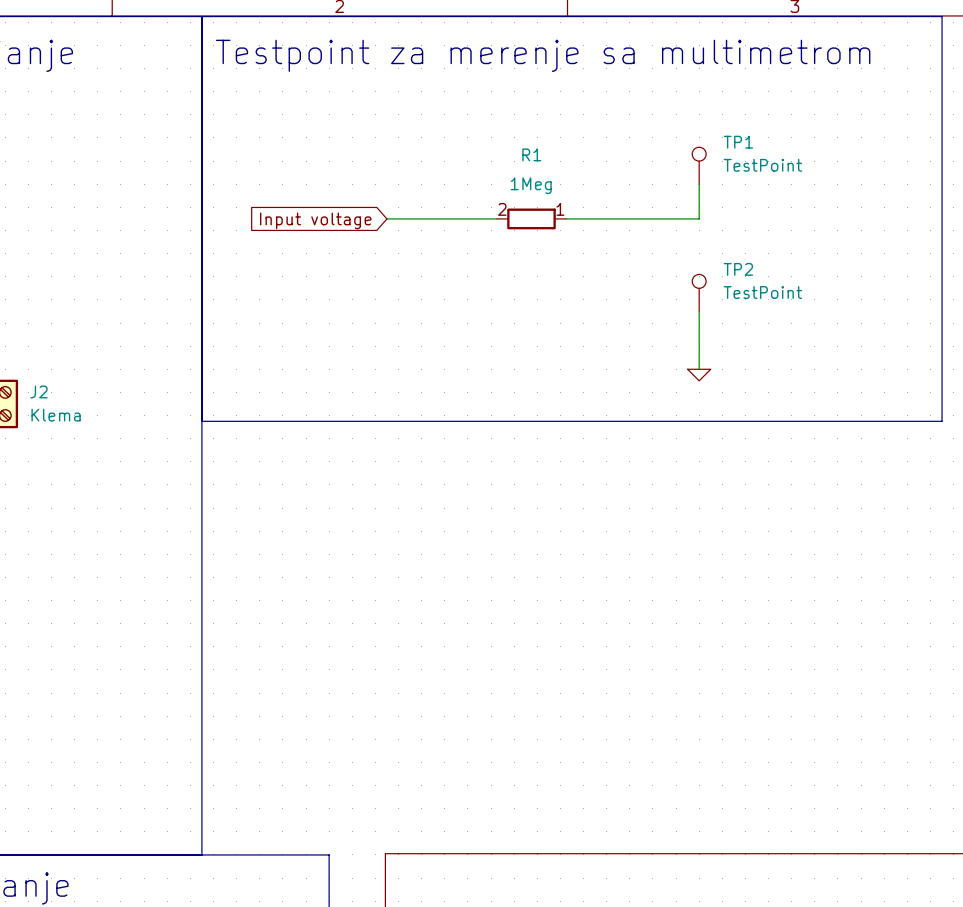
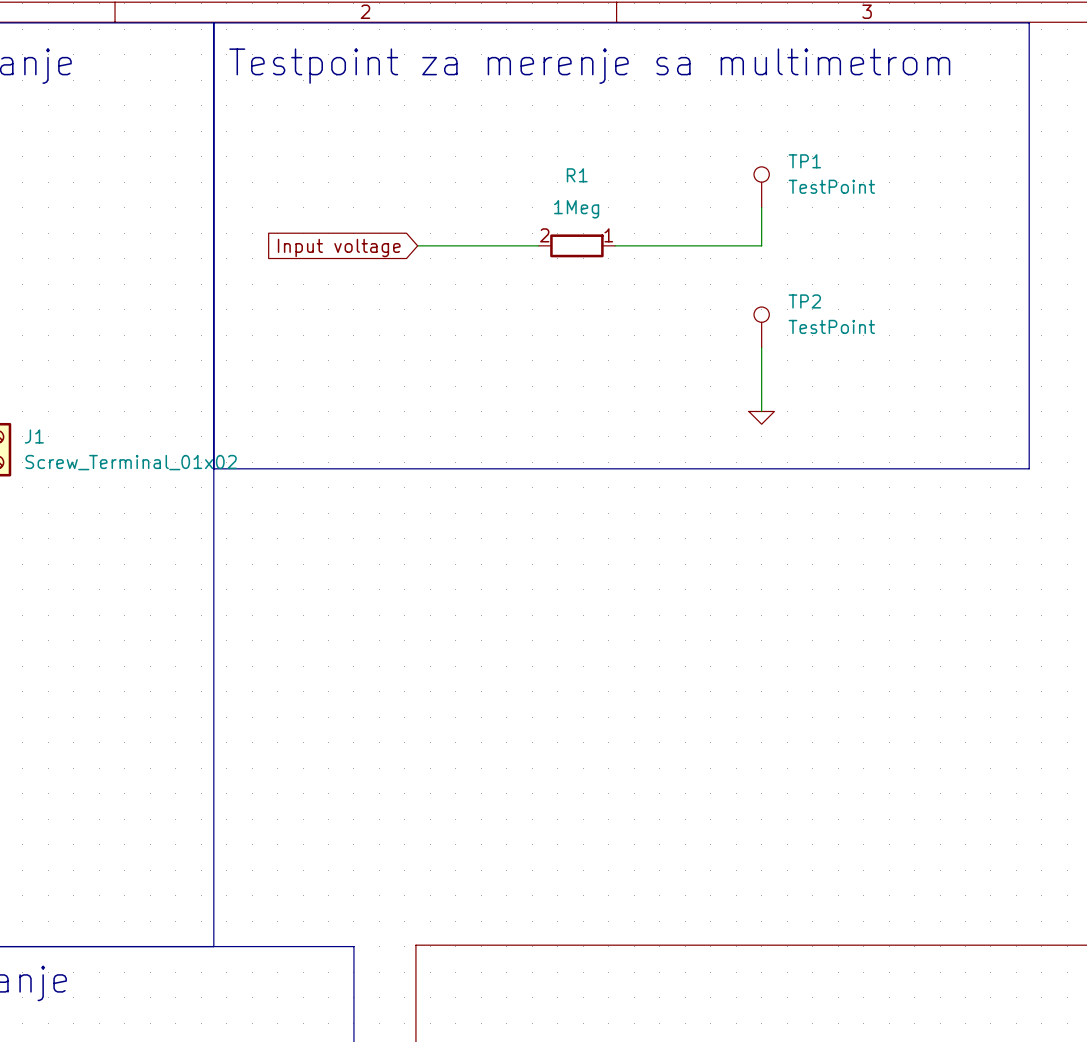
J2 name: J2 (39, 391) -> J1 (34, 436)
J2 value: Klema (56, 415) -> Screw_Terminal_01x02 (131, 462)

